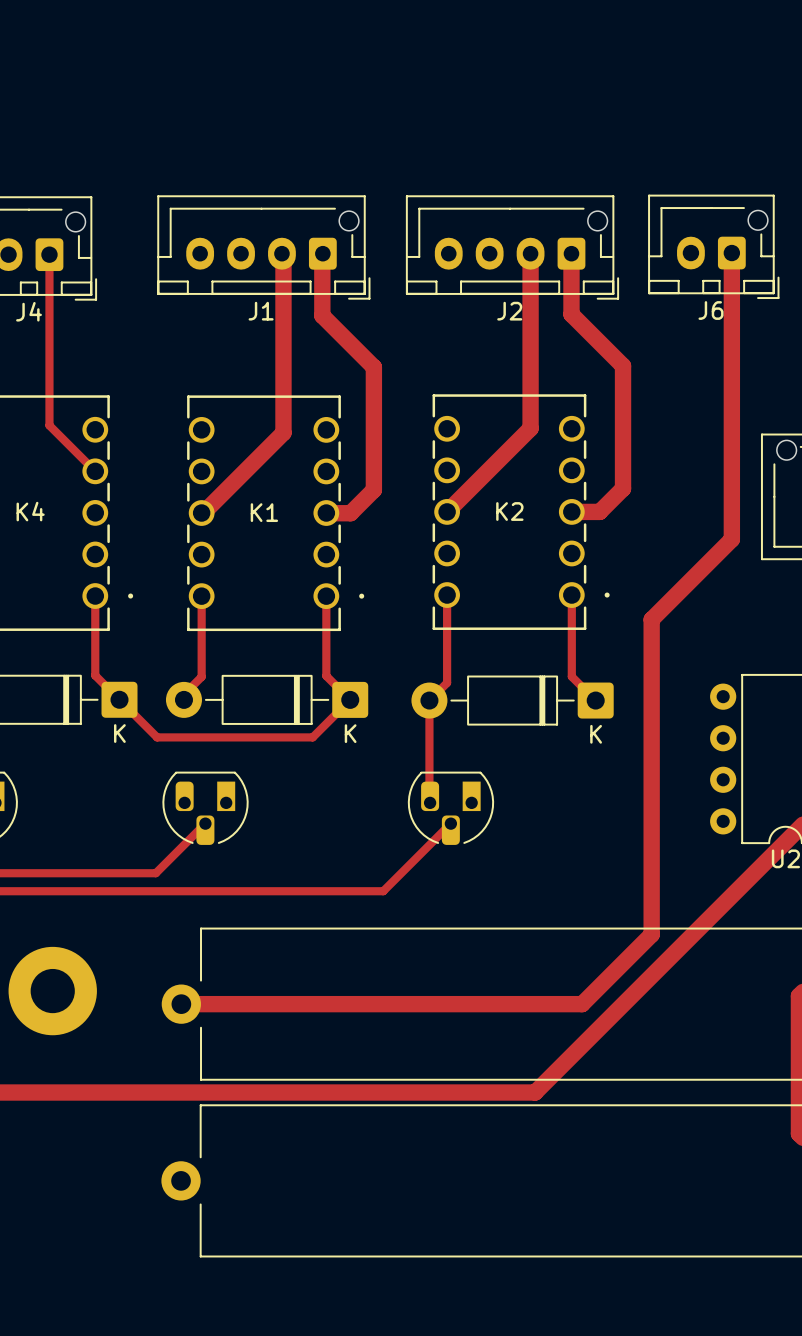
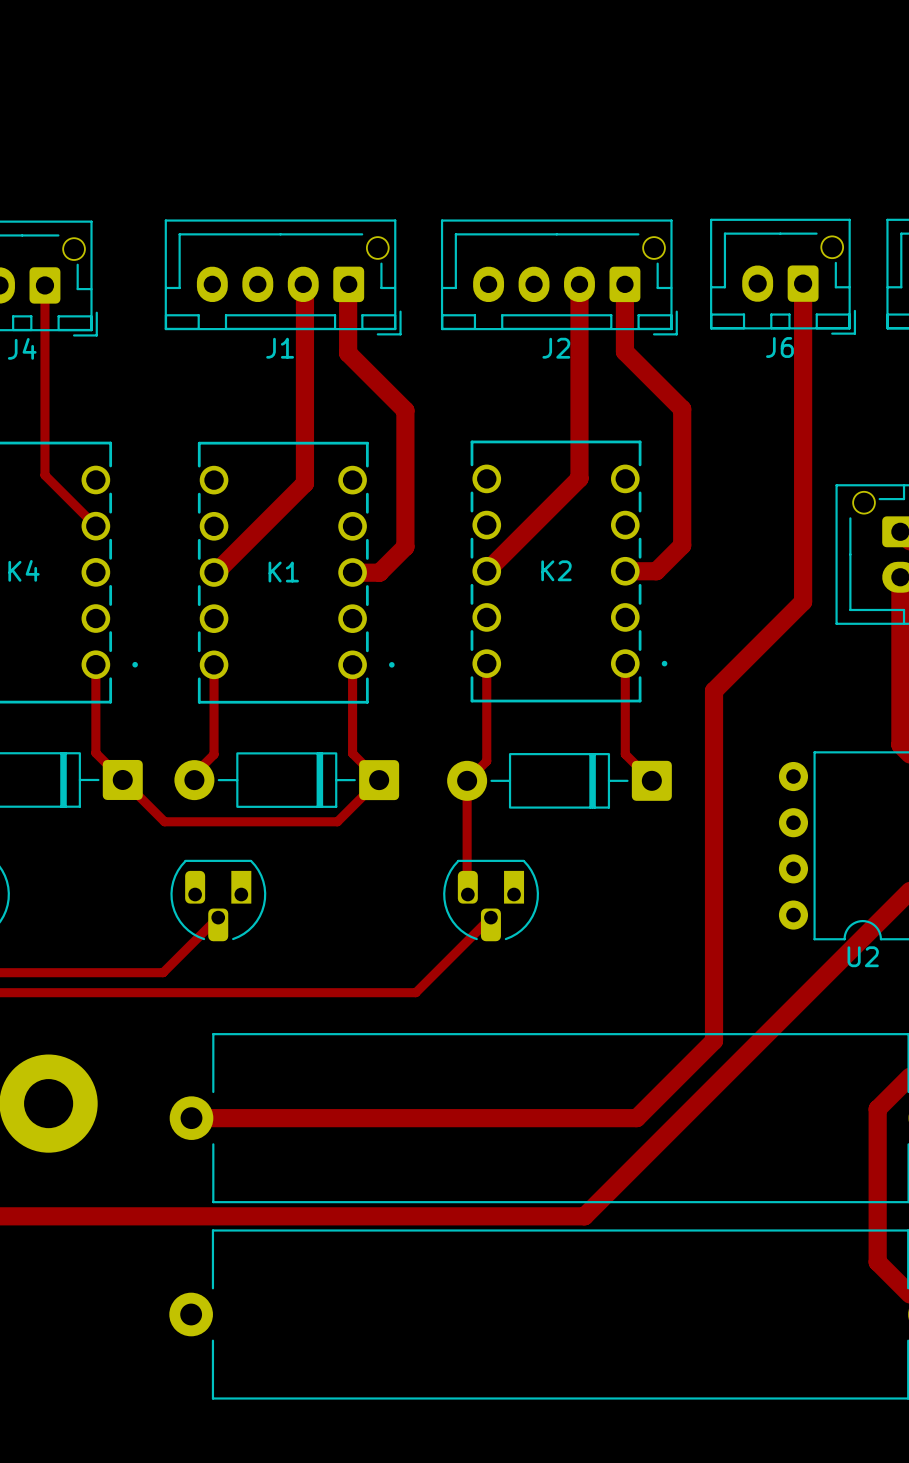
part text: K (119, 733) -> none
part text: K (350, 733) -> none
part text: K (596, 734) -> none

